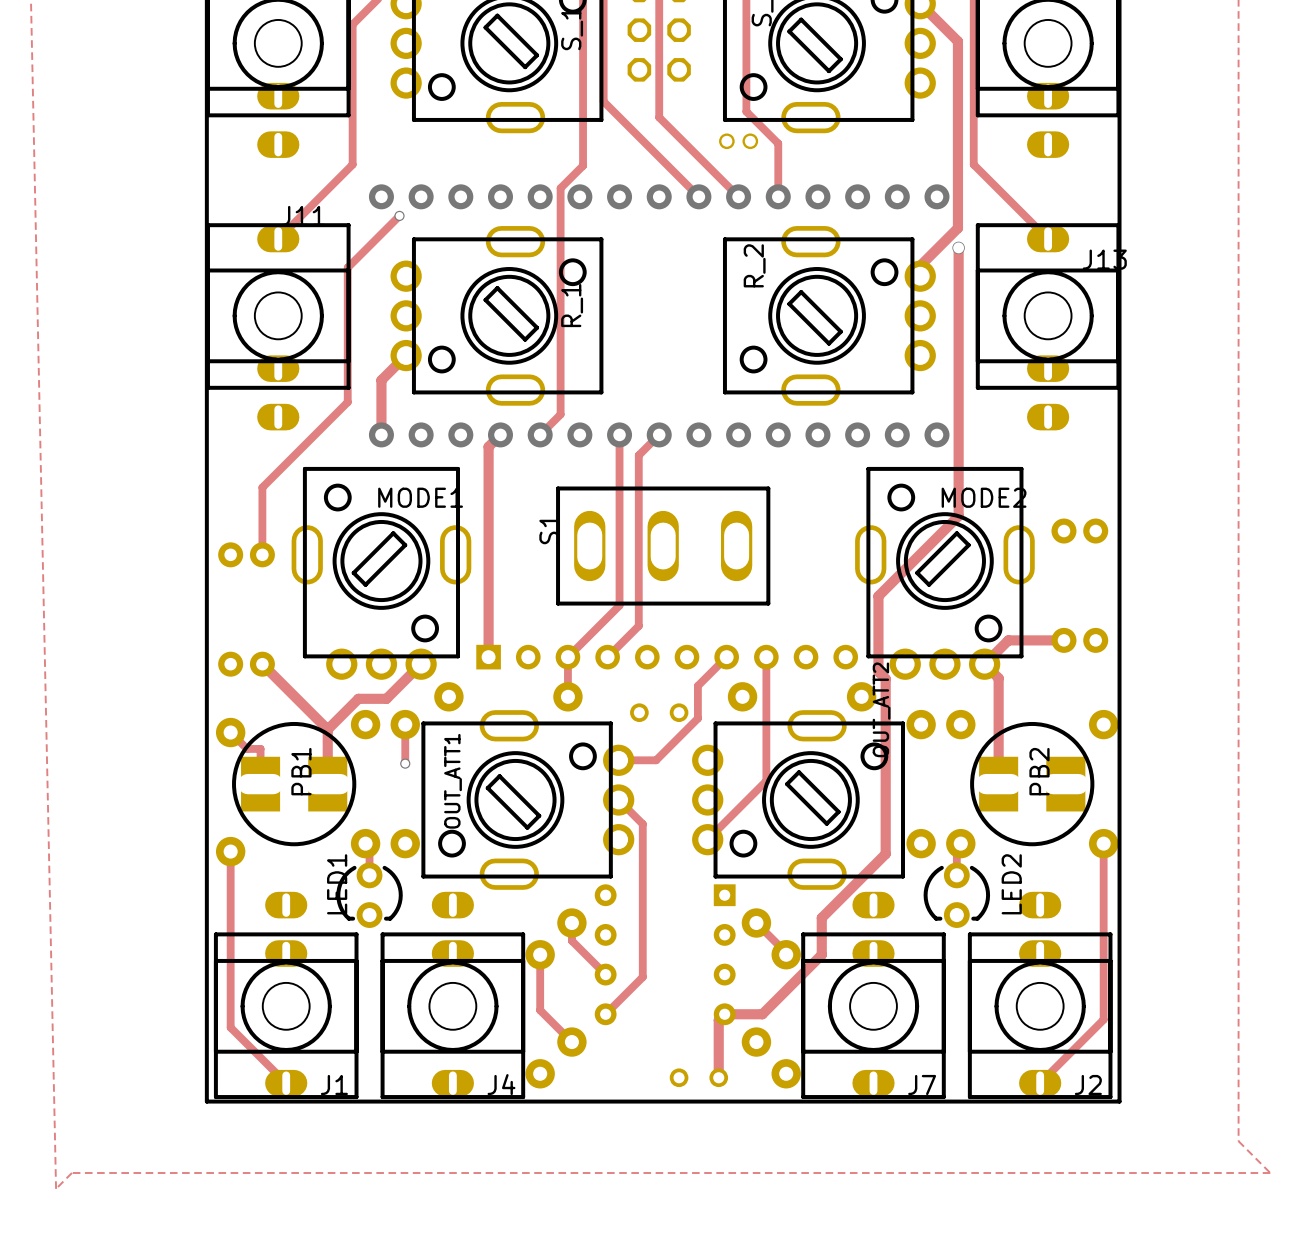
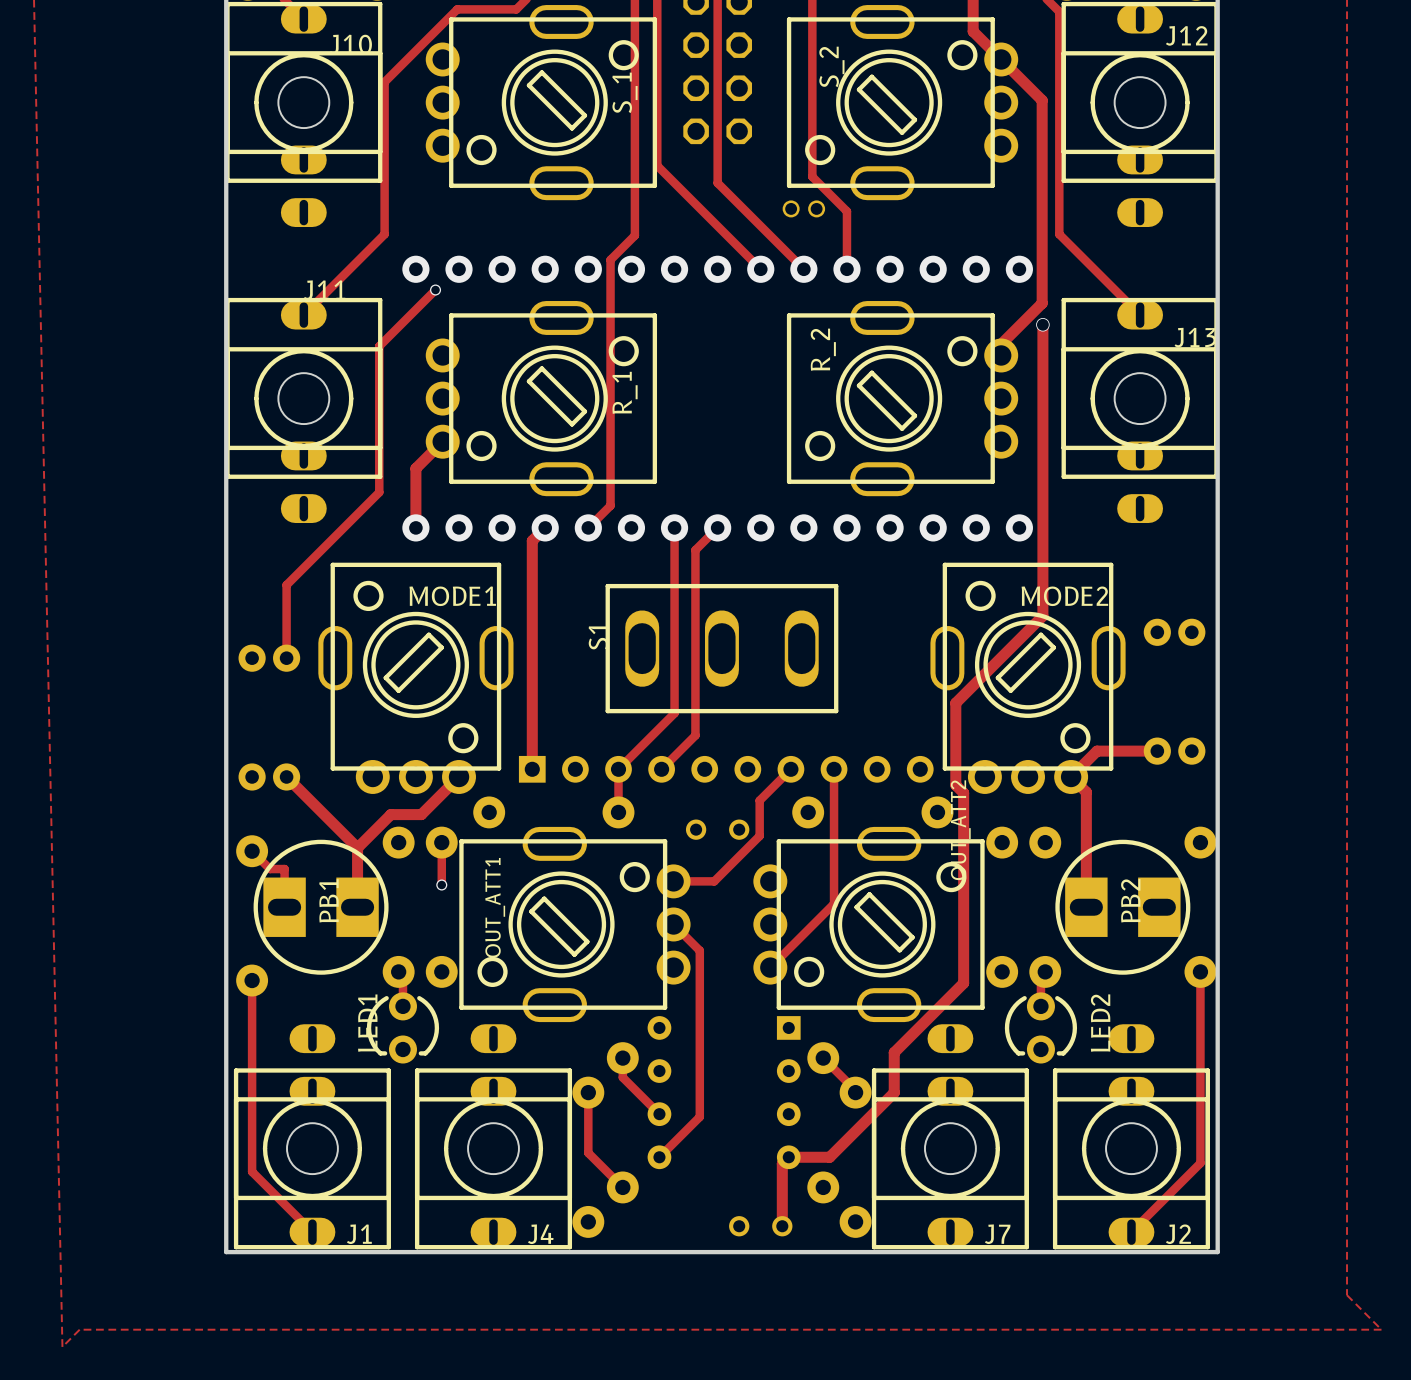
PB1 footprint: [232, 721, 357, 847] -> [253, 839, 389, 975]
PB2 footprint: [970, 721, 1095, 847] -> [1055, 839, 1191, 975]

